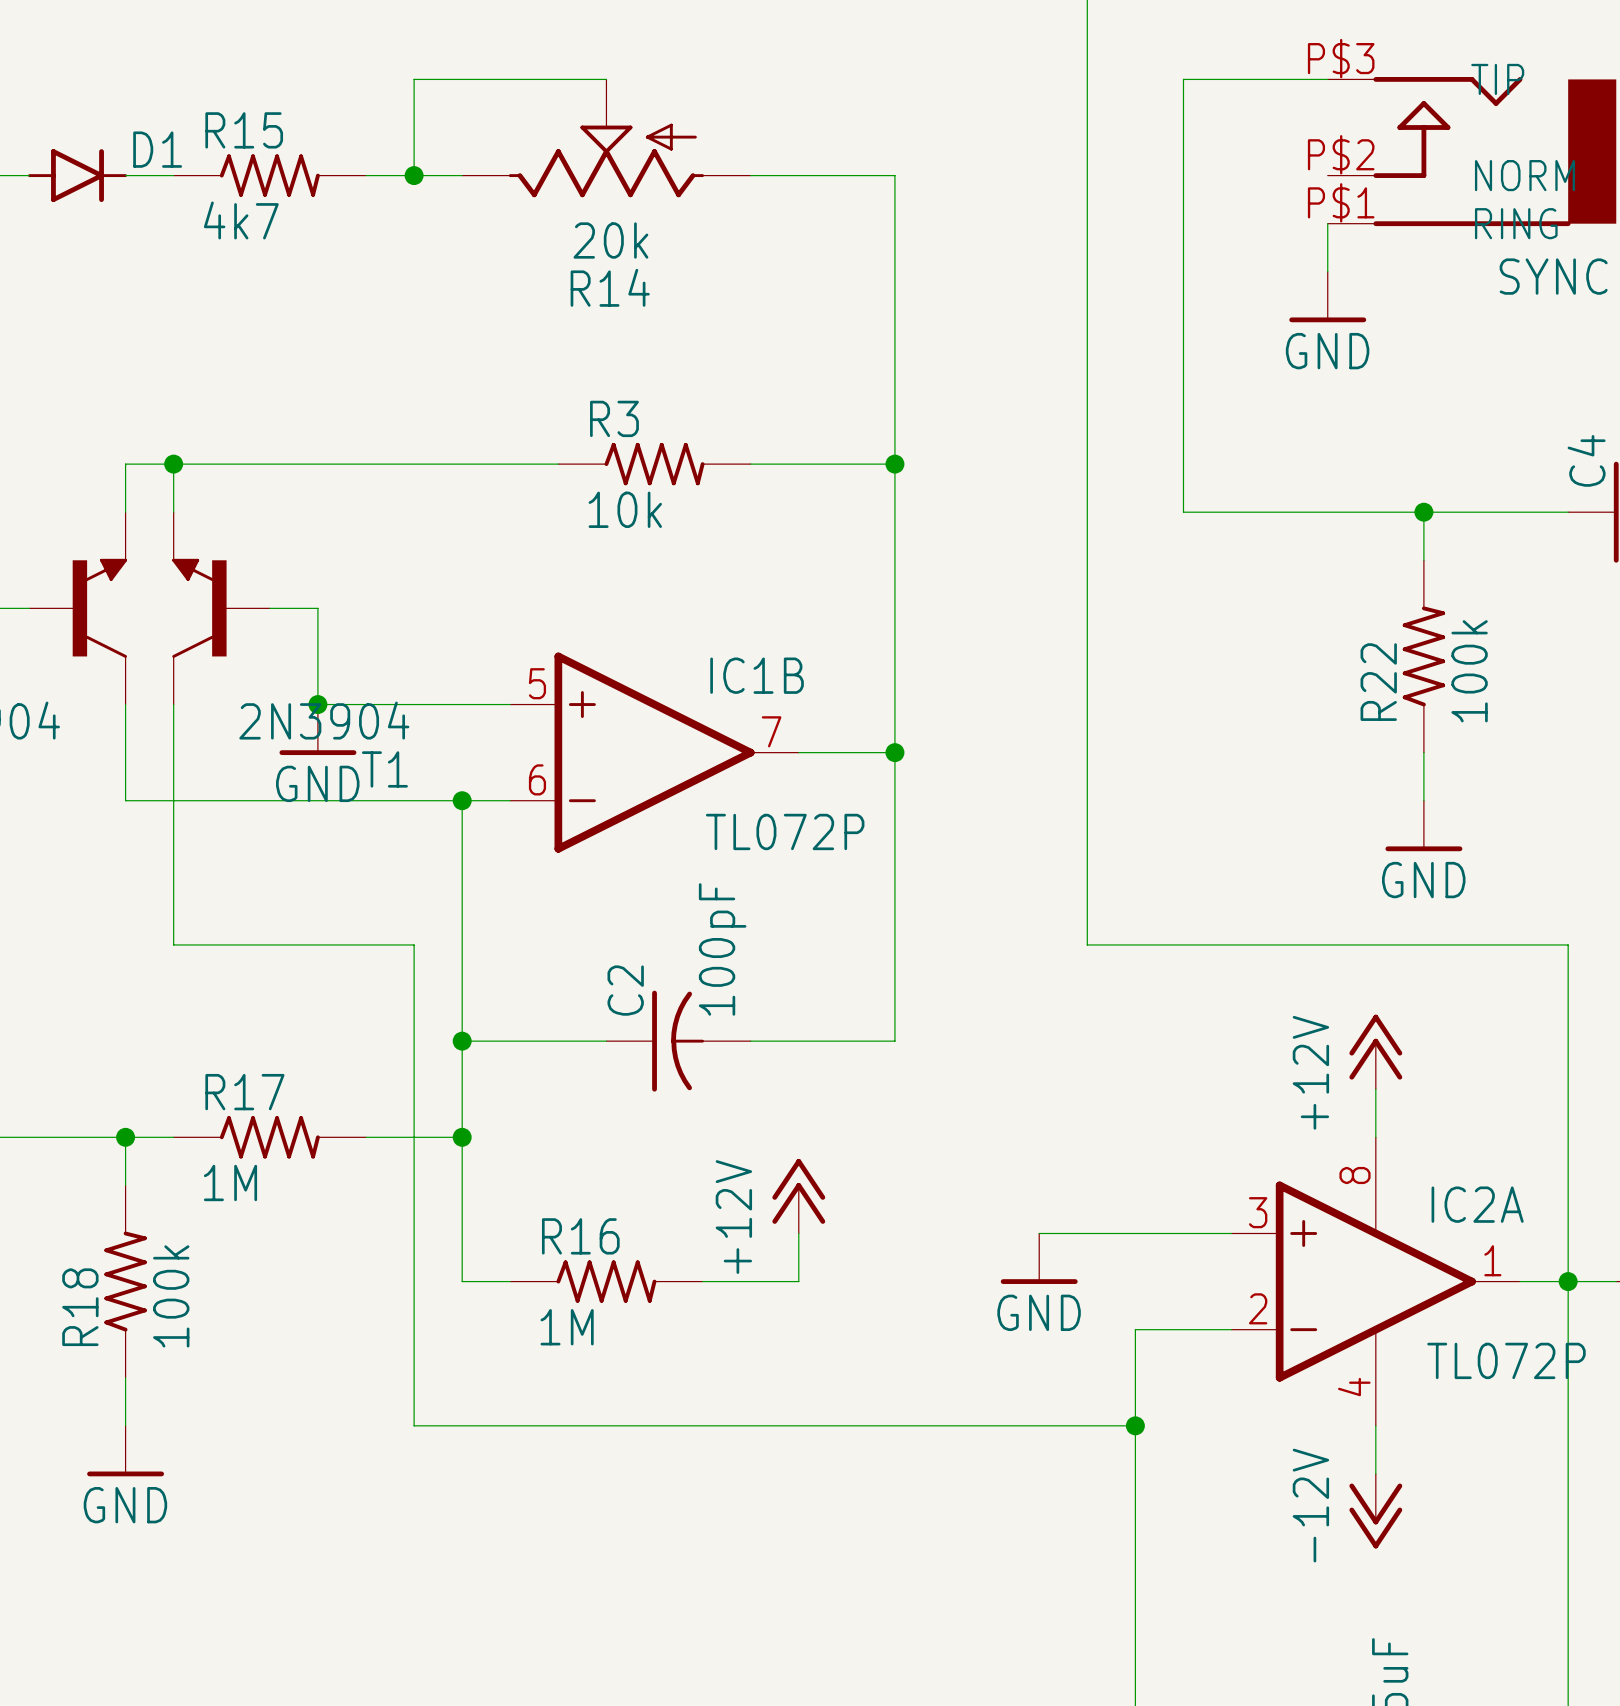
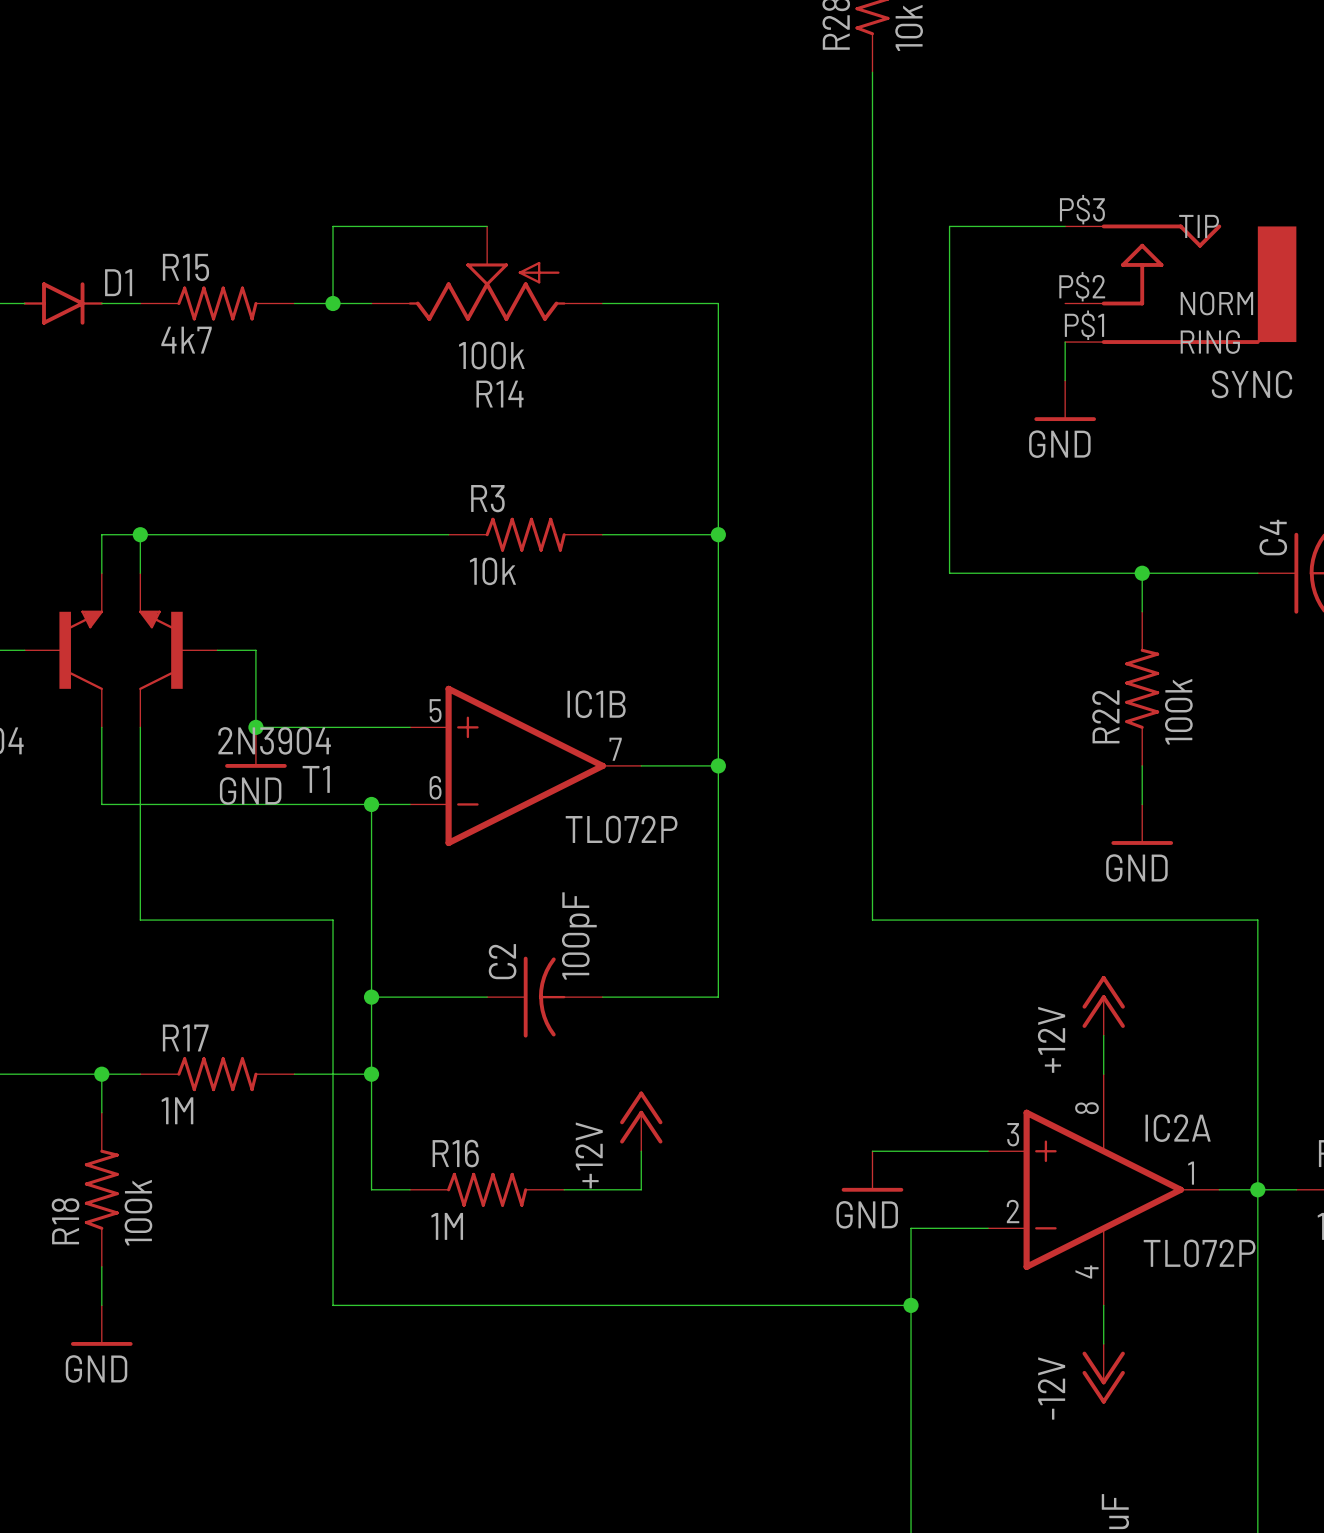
R14 value: 20k (610, 240) -> 100k (491, 355)
wire: (1039, 1233) (1087, 1233) -> none
power symbol position: GND (1039, 1258) -> GND (872, 1171)

